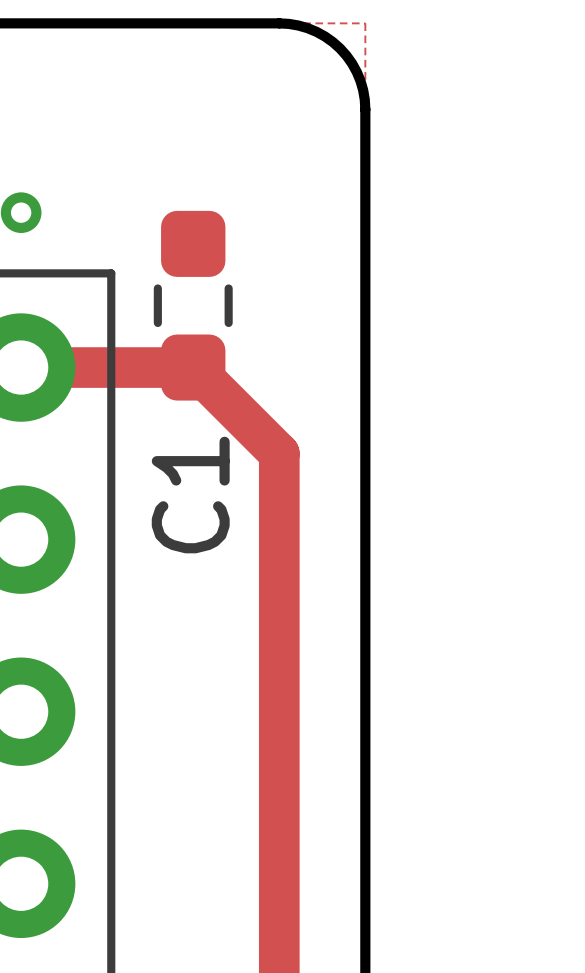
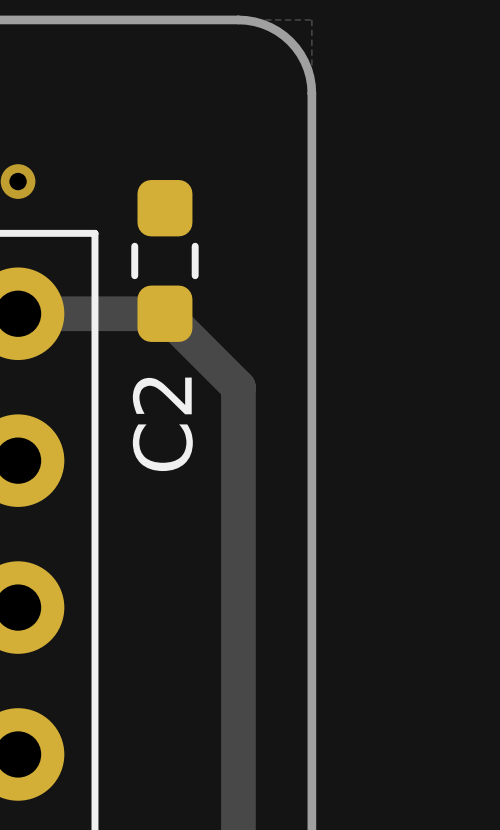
C1 name: C1 (190, 495) -> C2 (162, 424)

